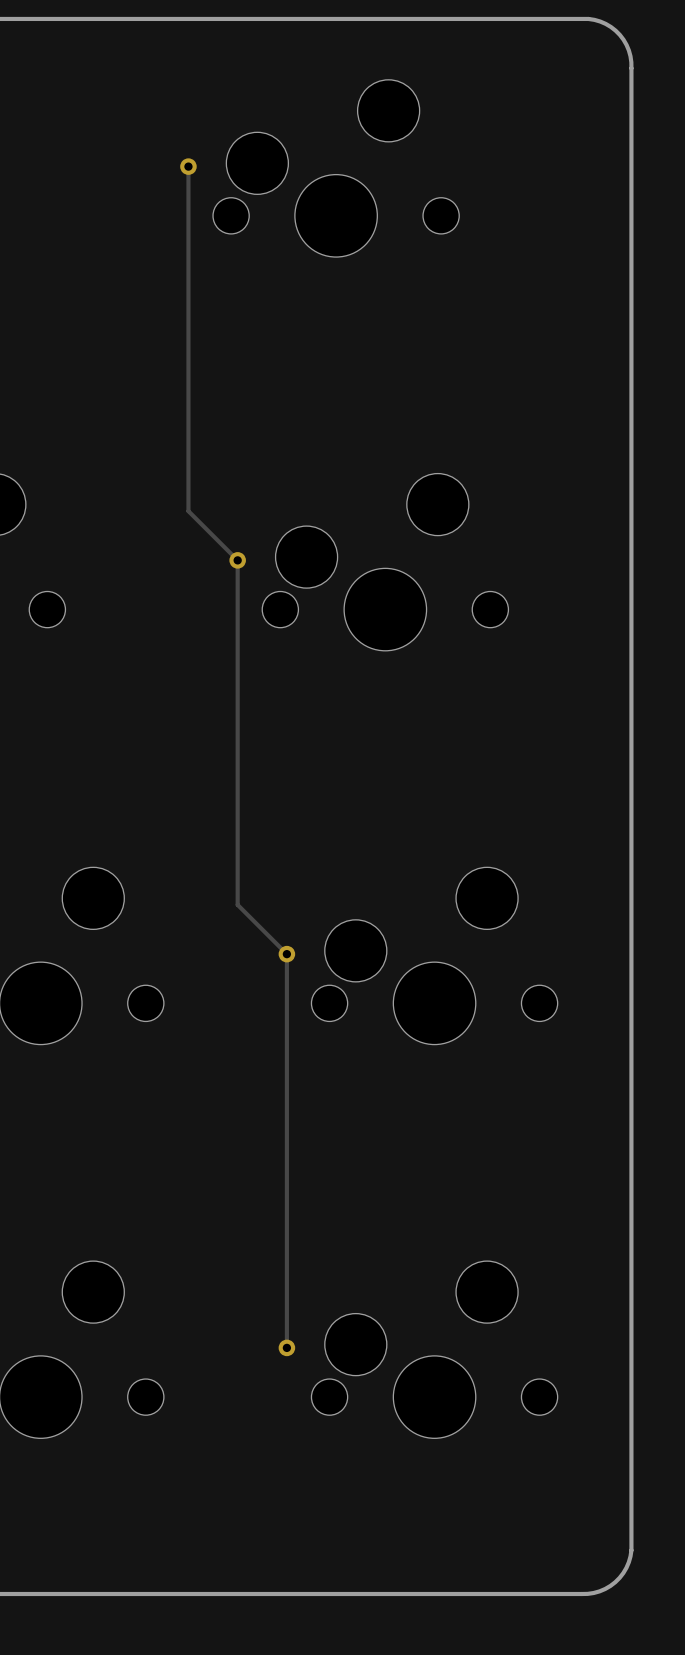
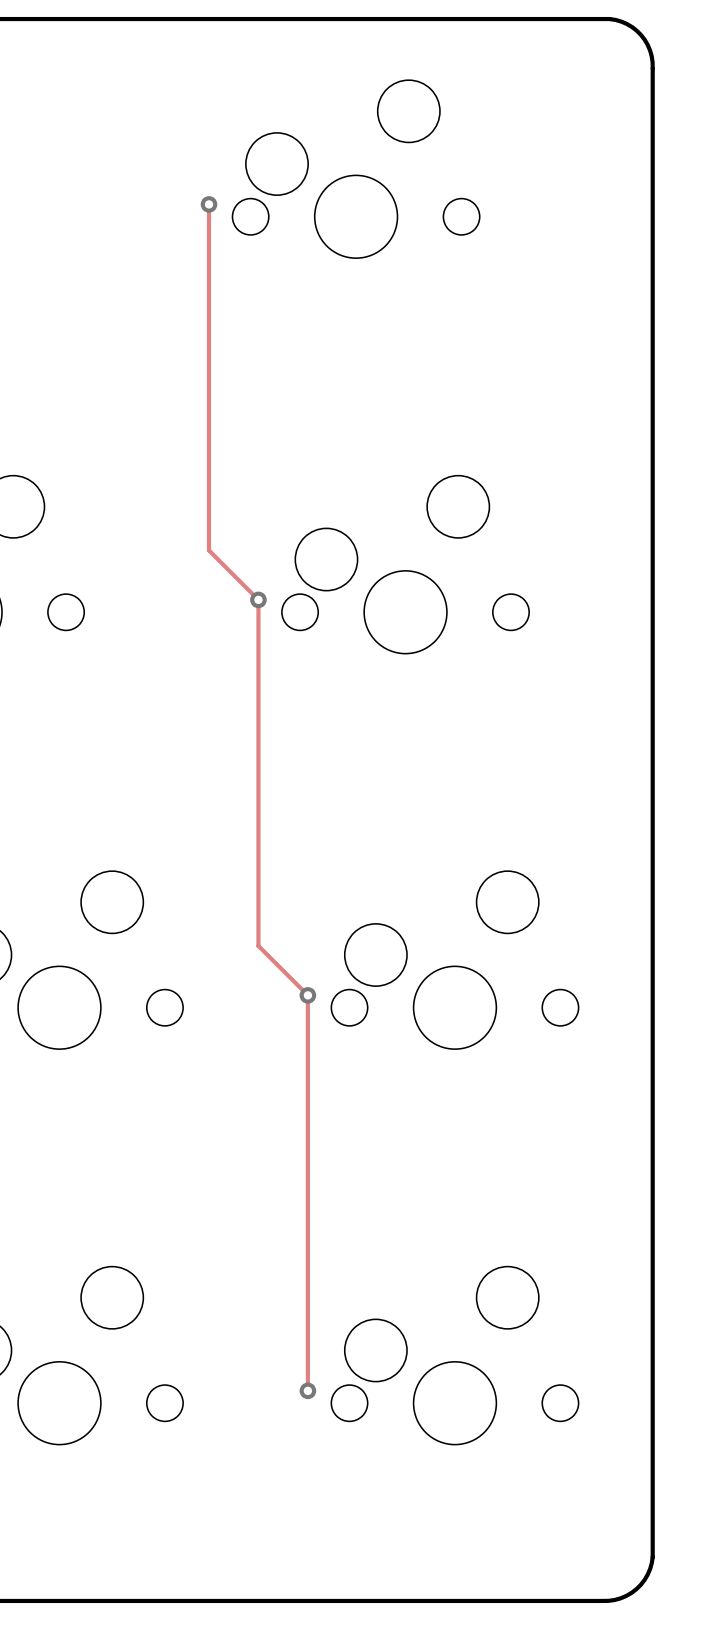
track: (188, 166) (188, 511) (237, 560) (237, 904) (286, 954) (286, 1347) -> (209, 204) (209, 550) (258, 599) (258, 945) (307, 995) (307, 1390)
via position: (188, 166) -> (209, 204)
via position: (237, 560) -> (258, 599)
via position: (286, 954) -> (307, 995)
via position: (286, 1347) -> (307, 1390)

